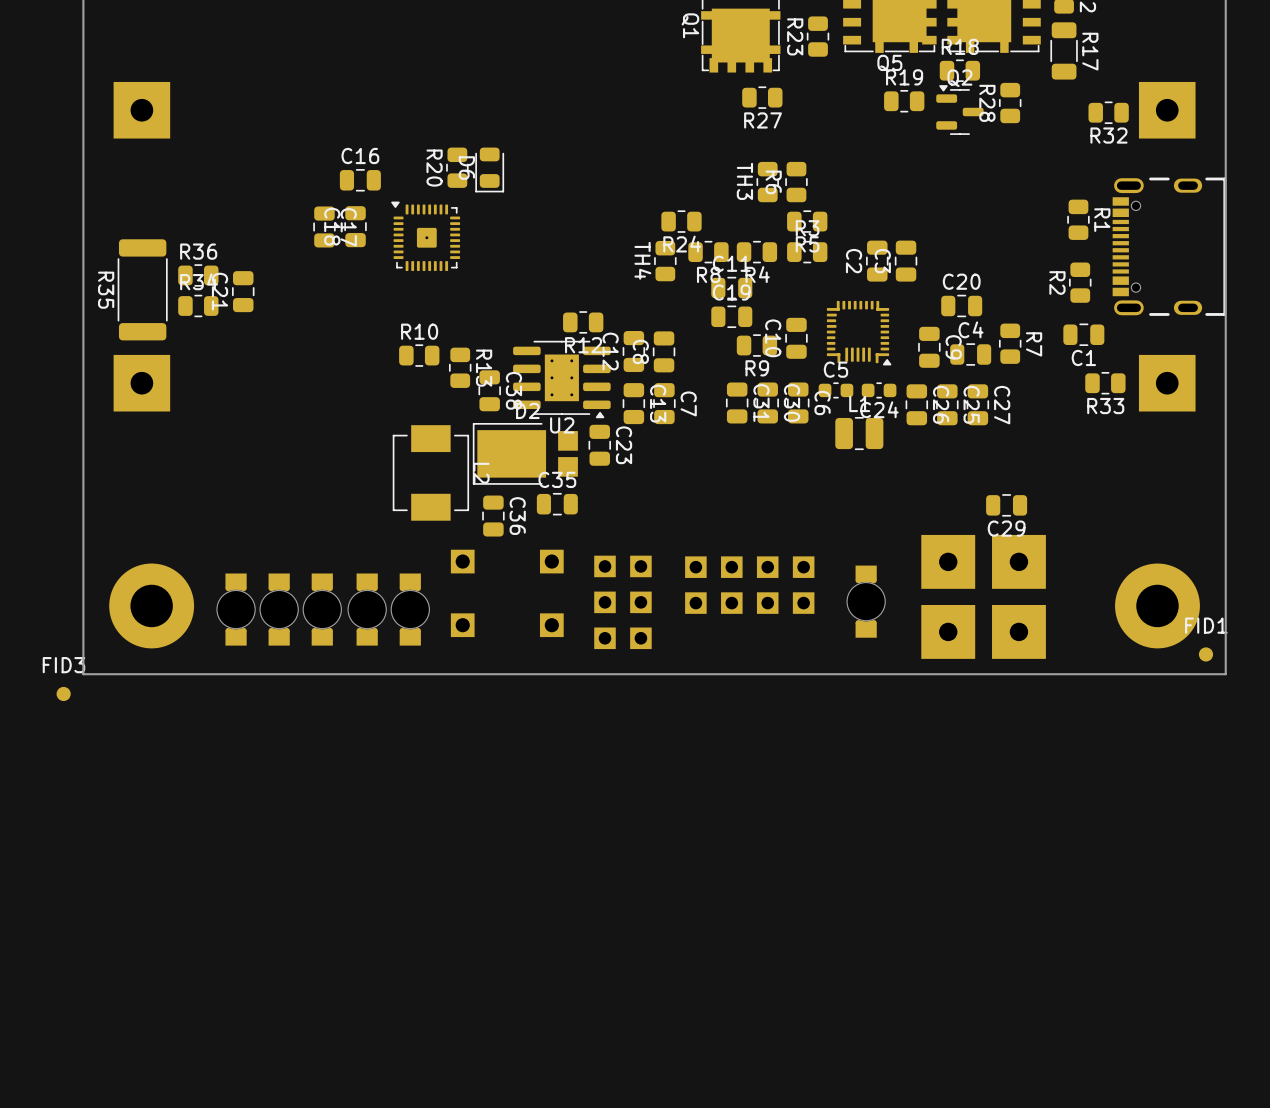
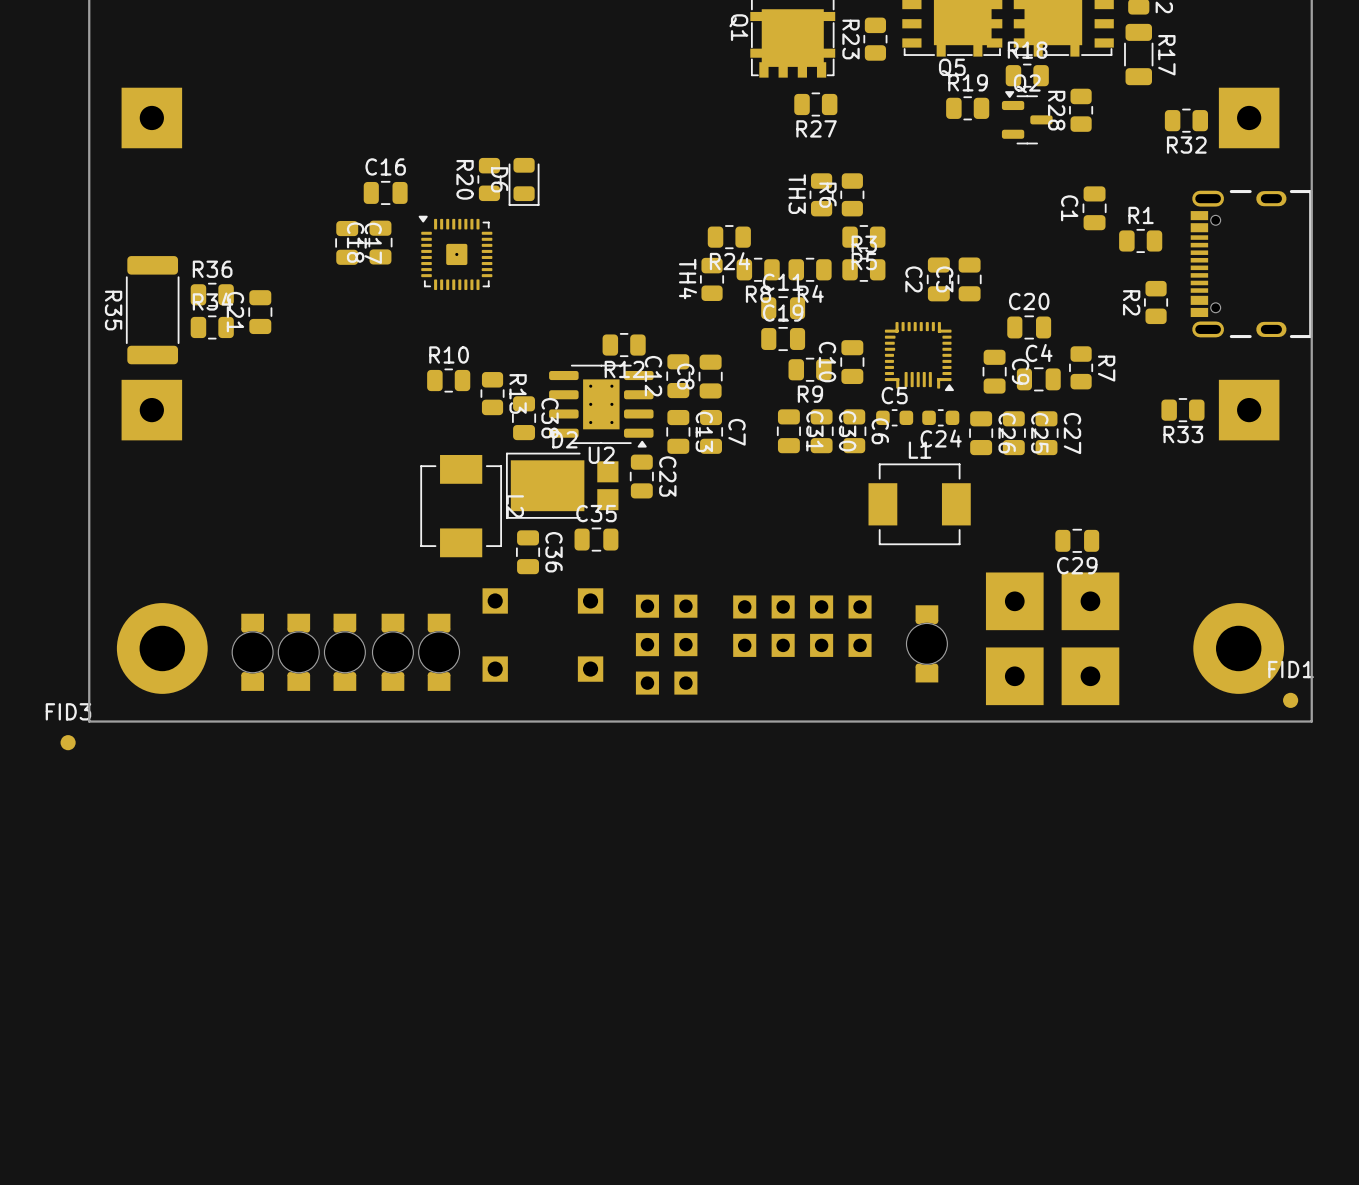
R1 rotation: 0° (1078, 219) -> 90° clockwise (1140, 240)
R1 name position: R1 (1102, 220) -> R1 (1141, 215)
C1 rotation: 0° (1083, 334) -> 90° clockwise (1094, 208)
C1 position: (1083, 334) -> (1094, 208)
L1 footprint: [835, 416, 884, 451] -> [868, 463, 971, 546]

